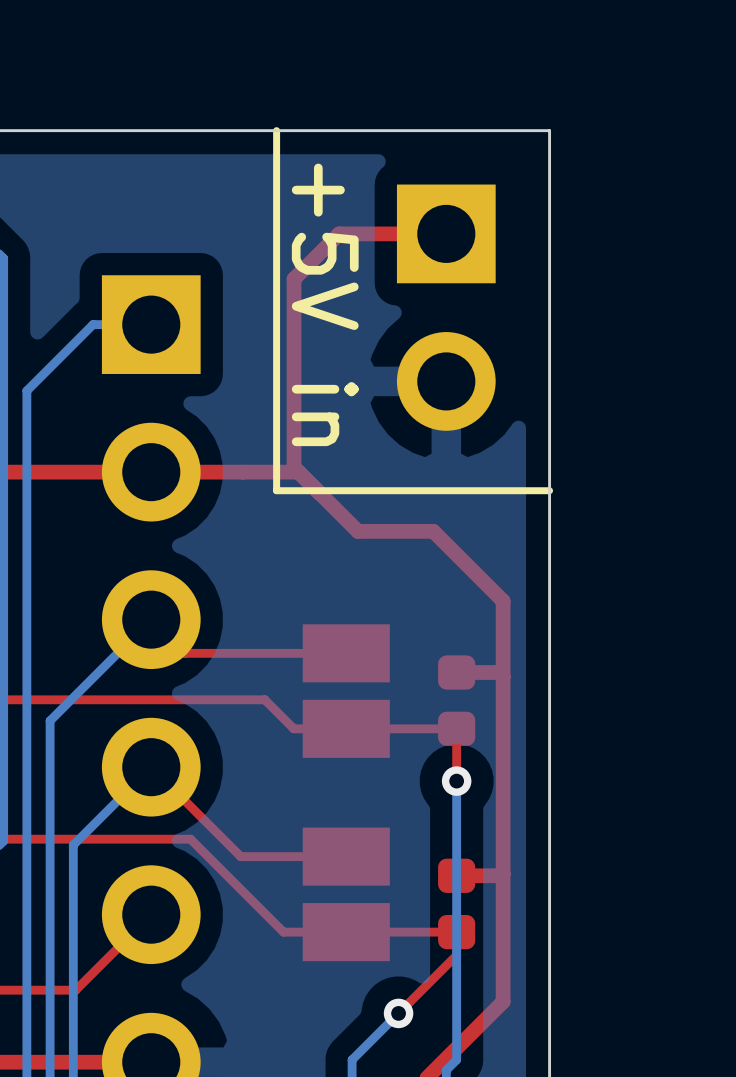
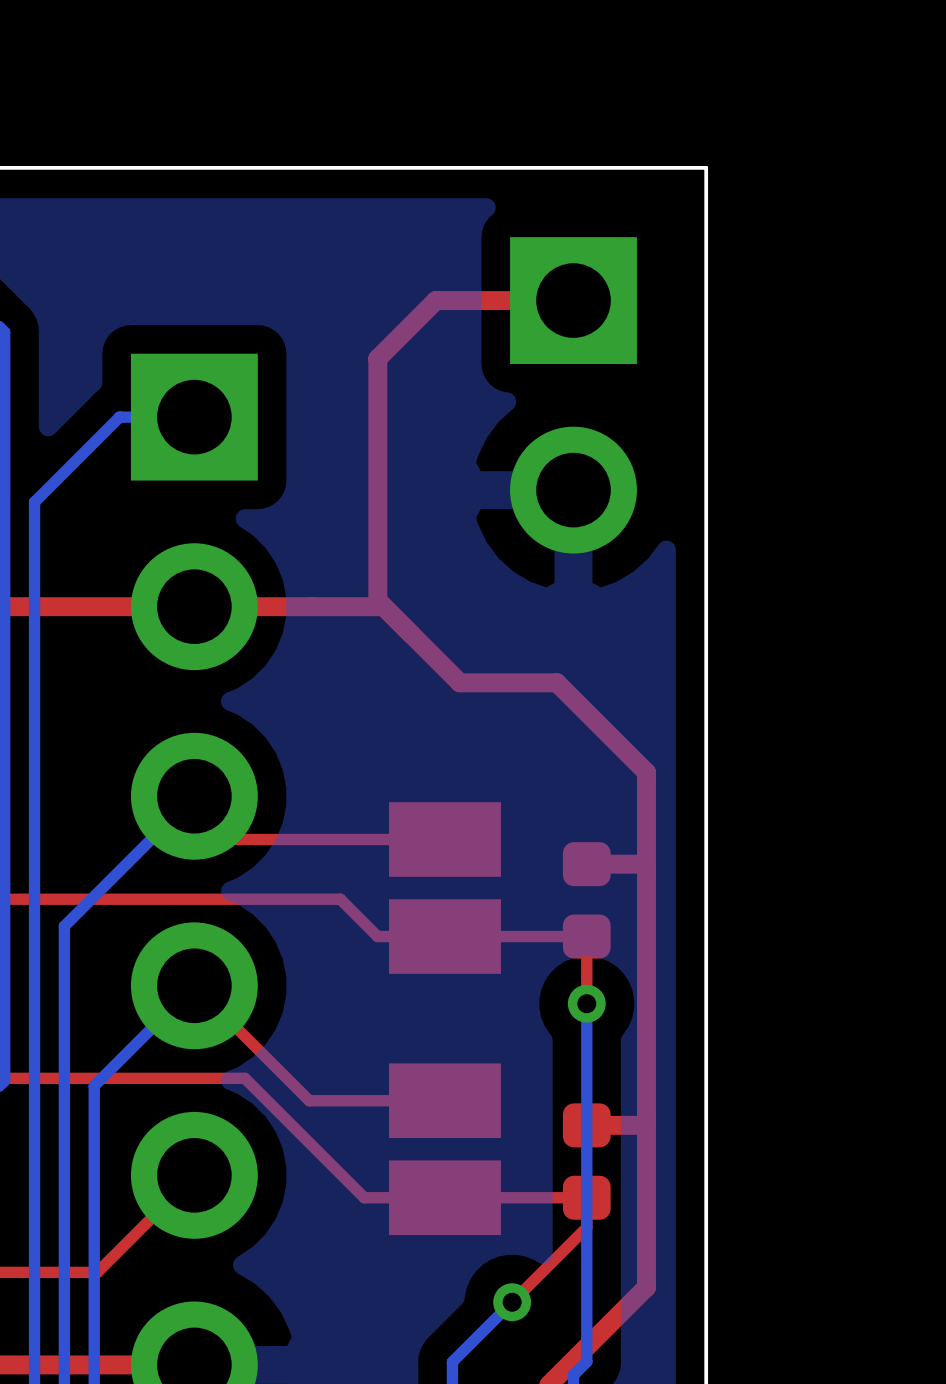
line: (276, 130) (276, 490) (549, 490) -> none
text: +5V in (325, 304) -> none

